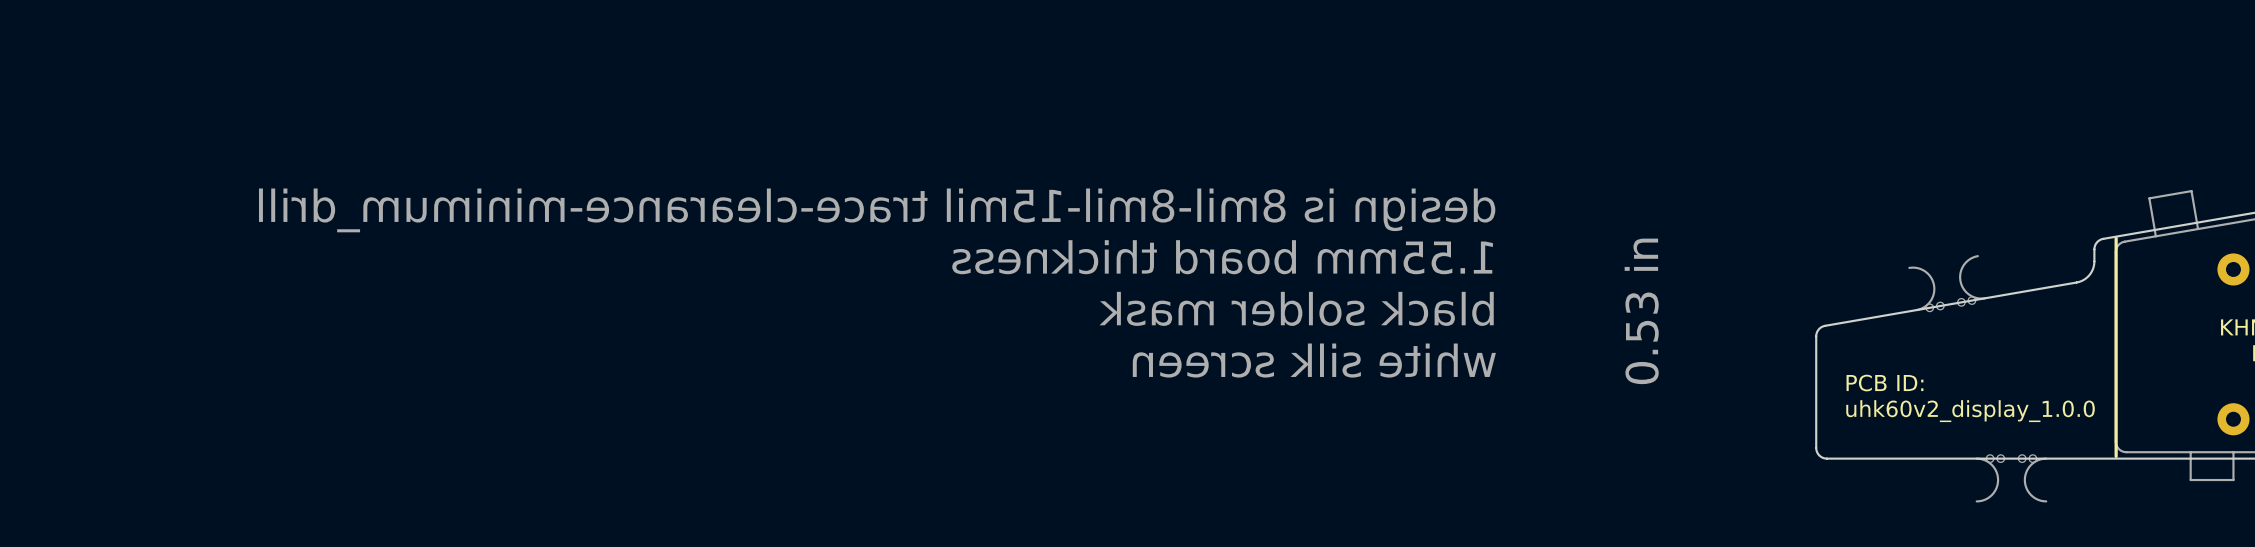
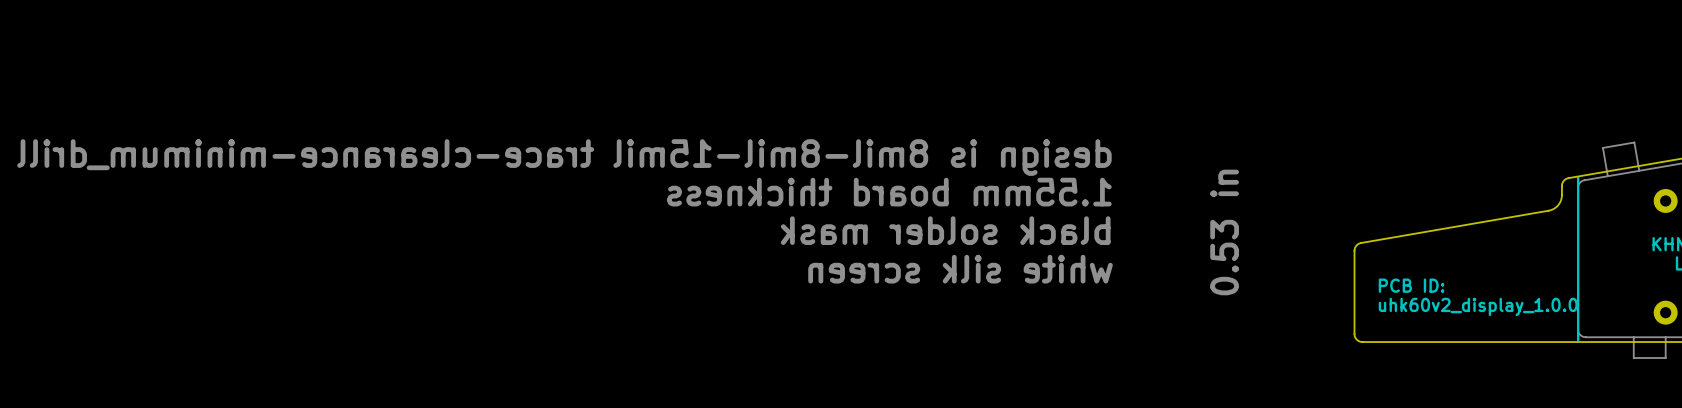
line: (1977, 256) (1970, 259) (1964, 264) (1960, 272) (1960, 280) (1963, 288) (1969, 294) (1976, 298) (1985, 298) -> none
line: (1909, 267) (1917, 268) (1925, 271) (1931, 277) (1934, 285) (1933, 293) (1930, 301) (1924, 307) (1916, 310) -> none
drawing: [1925, 296, 1976, 312] -> none
drawing: [1986, 454, 2037, 463] -> none
line: (1976, 458) (1984, 460) (1991, 464) (1996, 471) (1998, 480) (1996, 488) (1991, 495) (1984, 499) (1976, 501) -> none
line: (2046, 458) (2038, 460) (2031, 464) (2026, 471) (2024, 480) (2026, 488) (2031, 495) (2038, 499) (2046, 501) -> none

